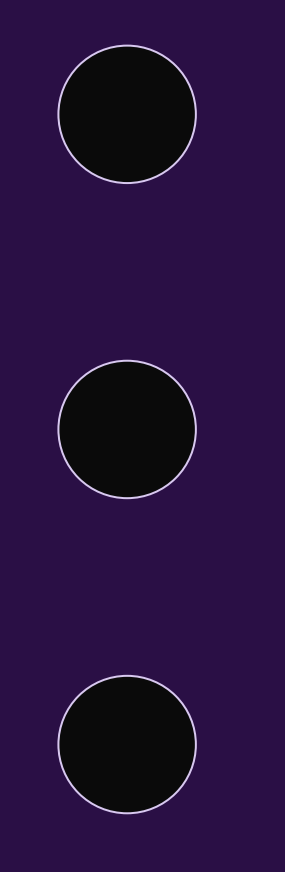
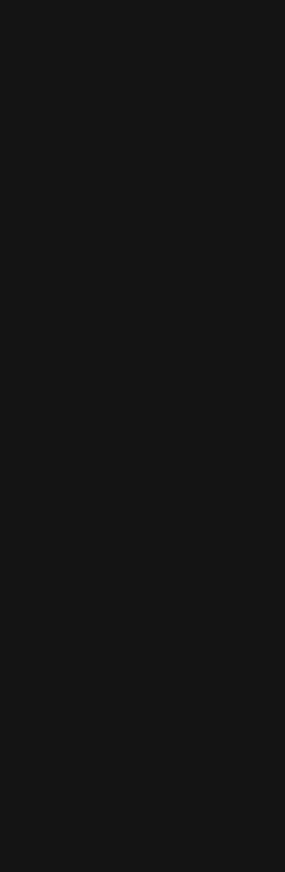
part: (127, 114) -> none
part: (127, 429) -> none
part: (127, 744) -> none

